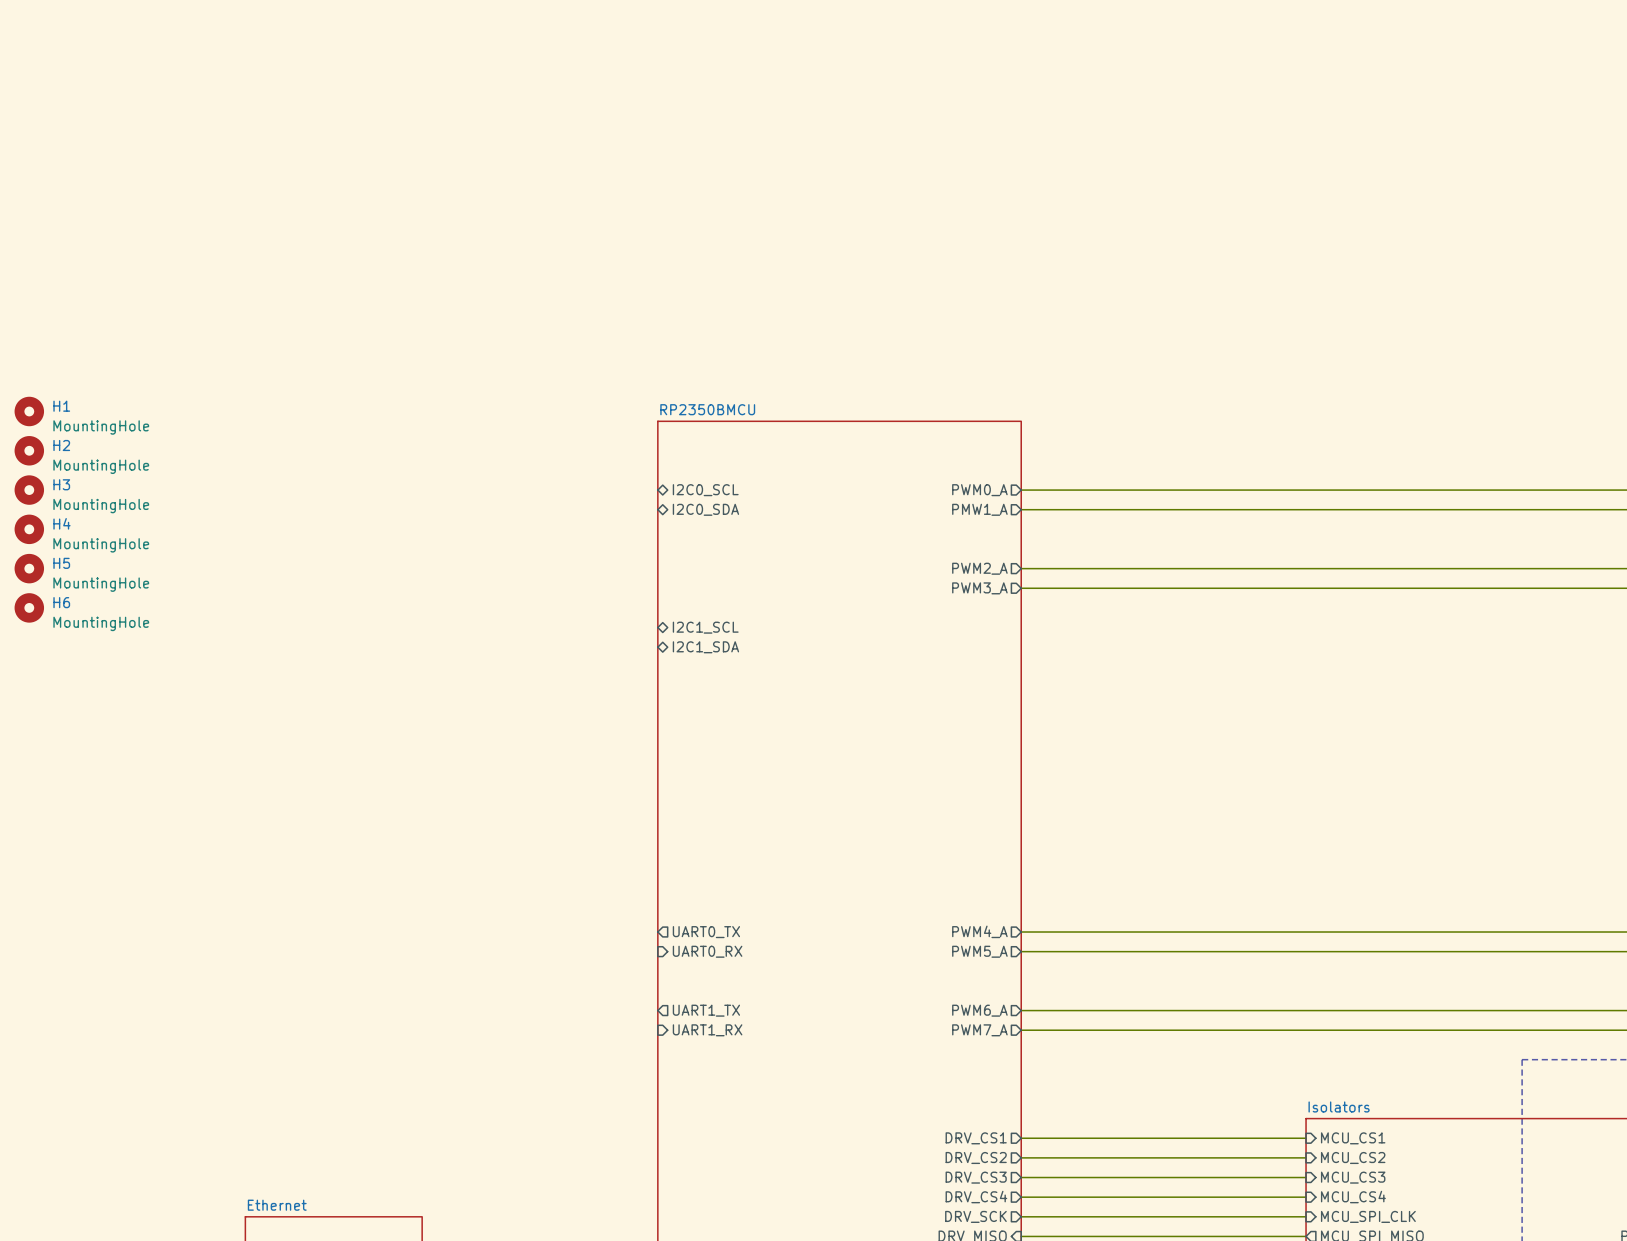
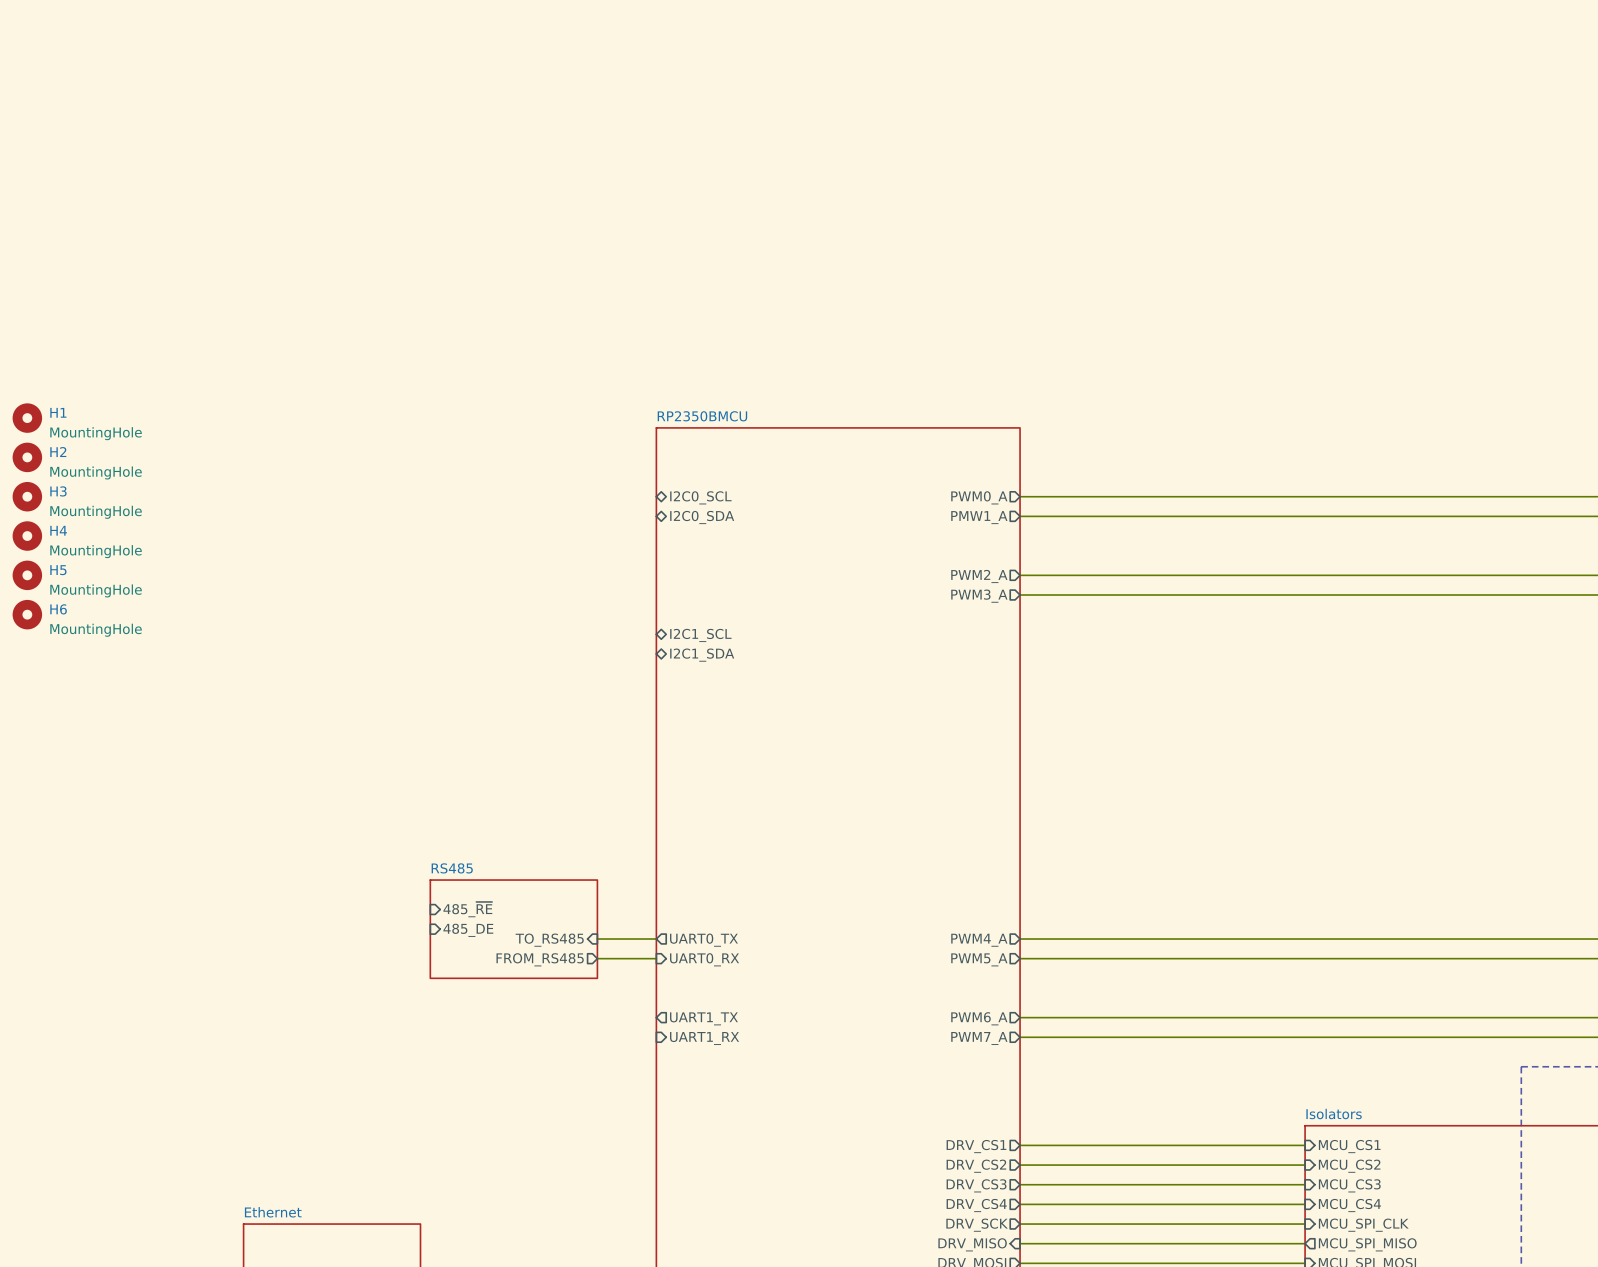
sheet pin: none -> 485_~{RE} (467, 909)
sheet pin: none -> 485_DE (468, 930)
sheet RS485: none -> (513, 929)
sheet pin: none -> TO_RS485 (549, 940)
wire: none -> (597, 939) (656, 939)
sheet pin: none -> FROM_RS485 (540, 959)
wire: none -> (597, 958) (656, 958)

